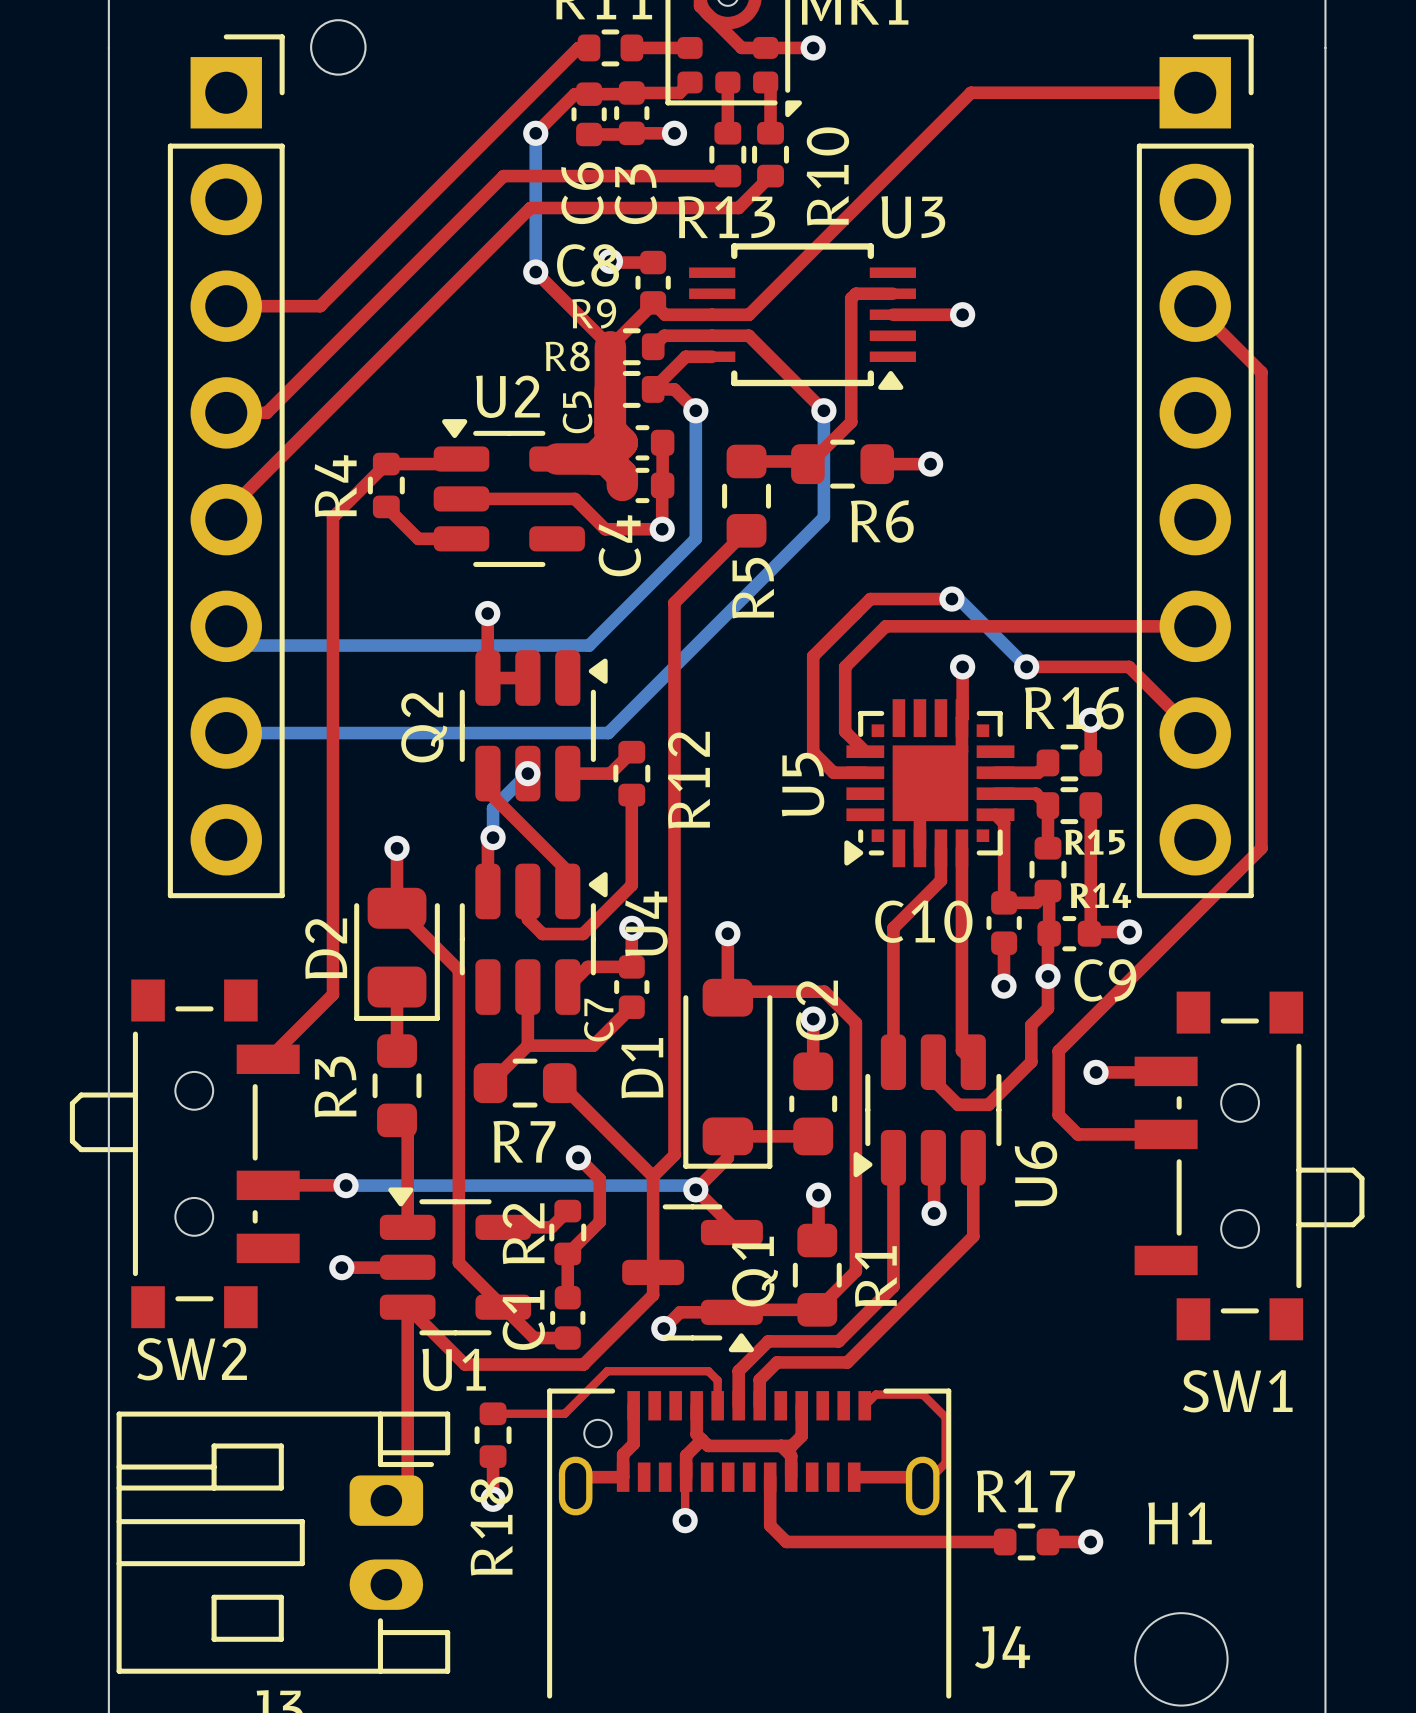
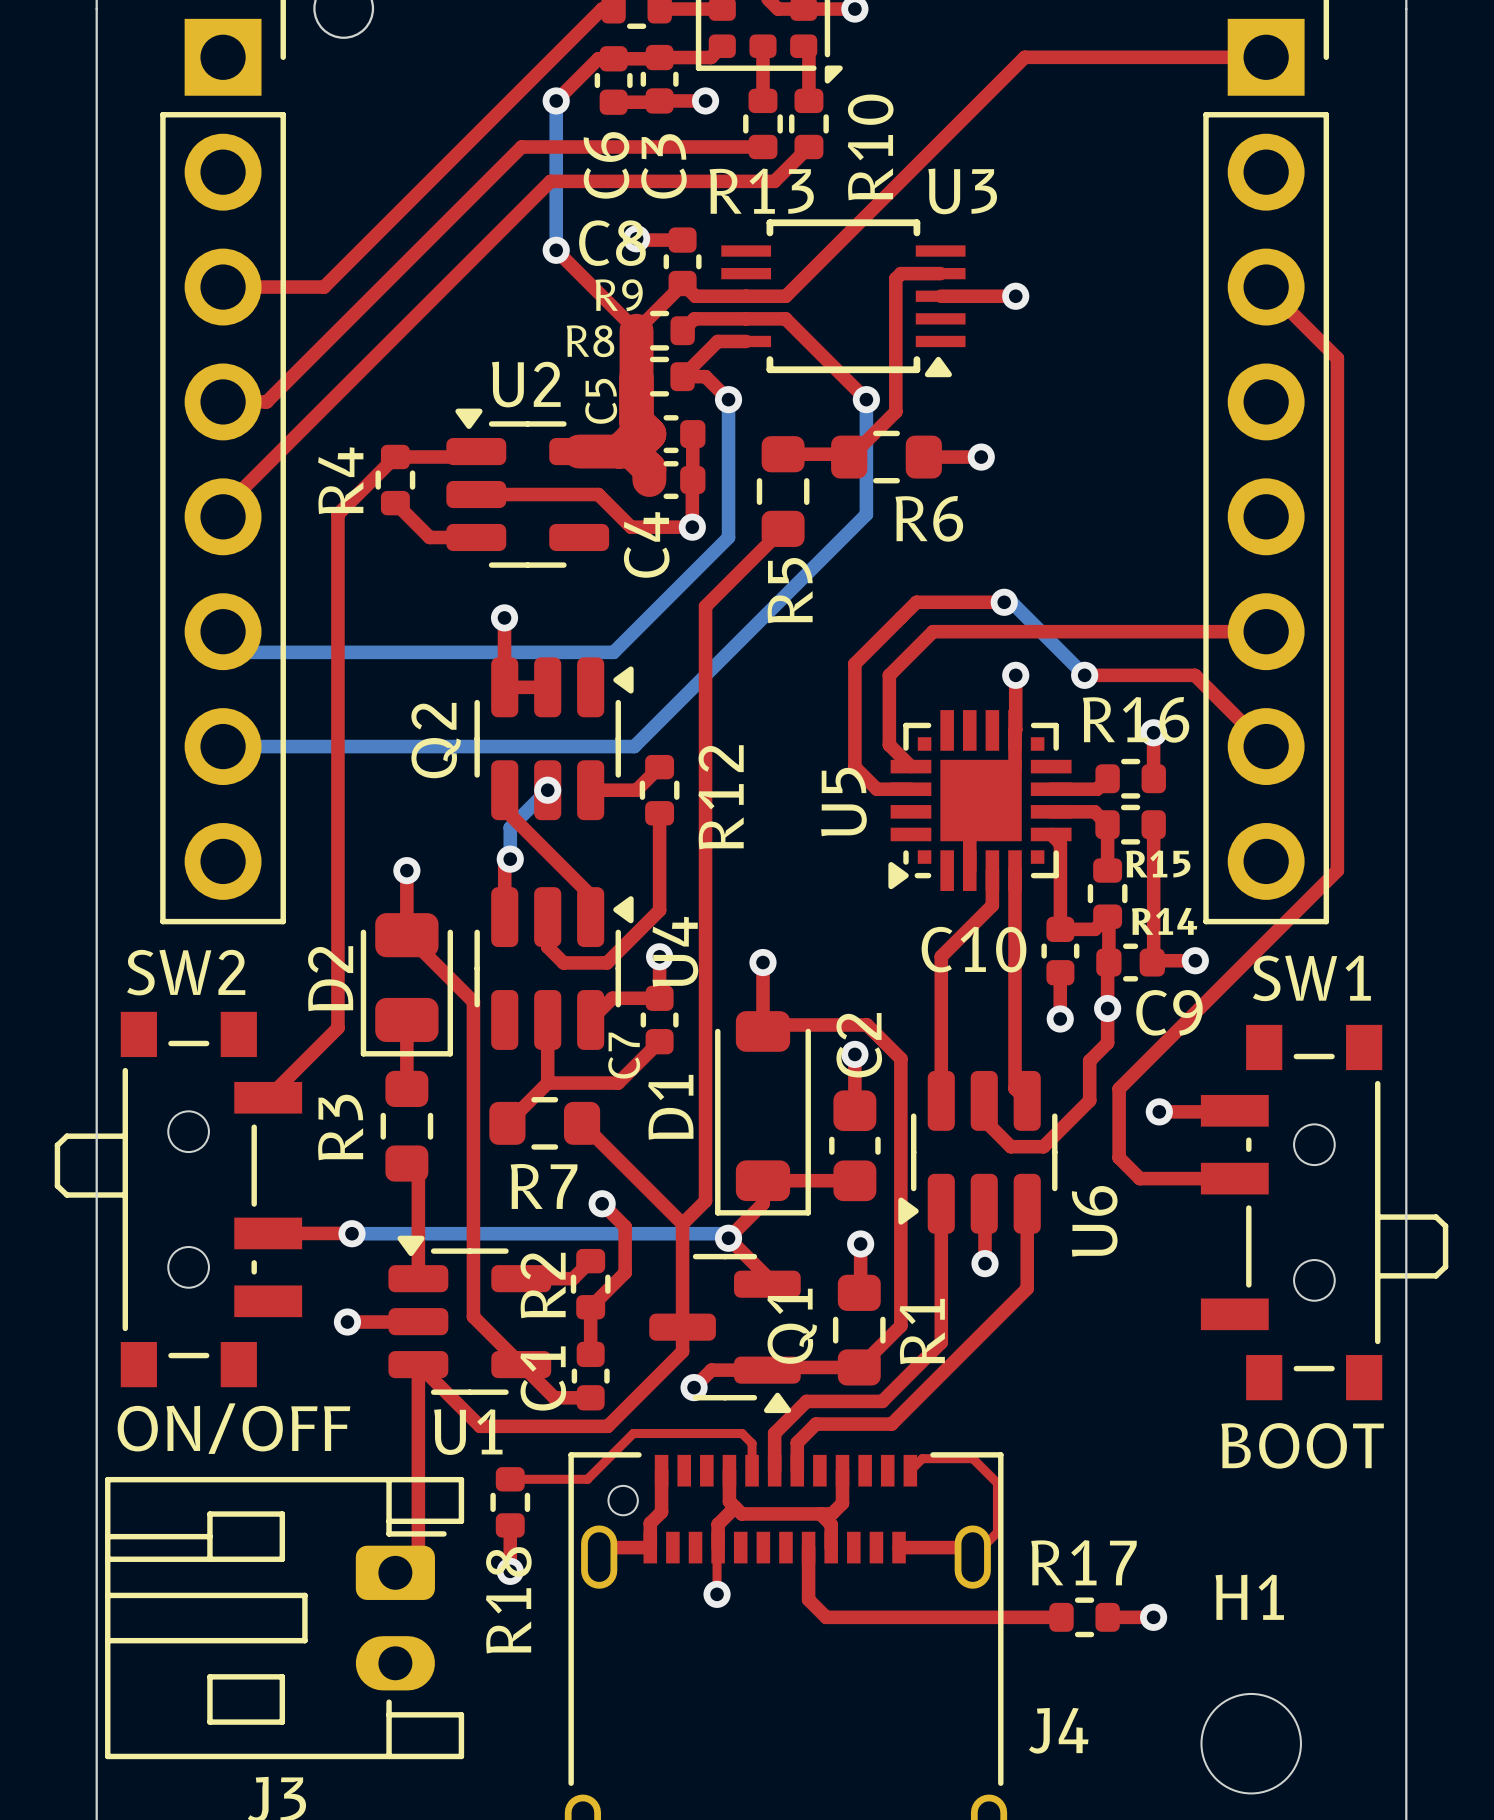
SW2 name position: SW2 (192, 1359) -> SW2 (186, 972)
text: none -> ON/OFF (233, 1428)
text: none -> BOOT (1302, 1445)
SW1 name position: SW1 (1237, 1391) -> SW1 (1311, 978)

